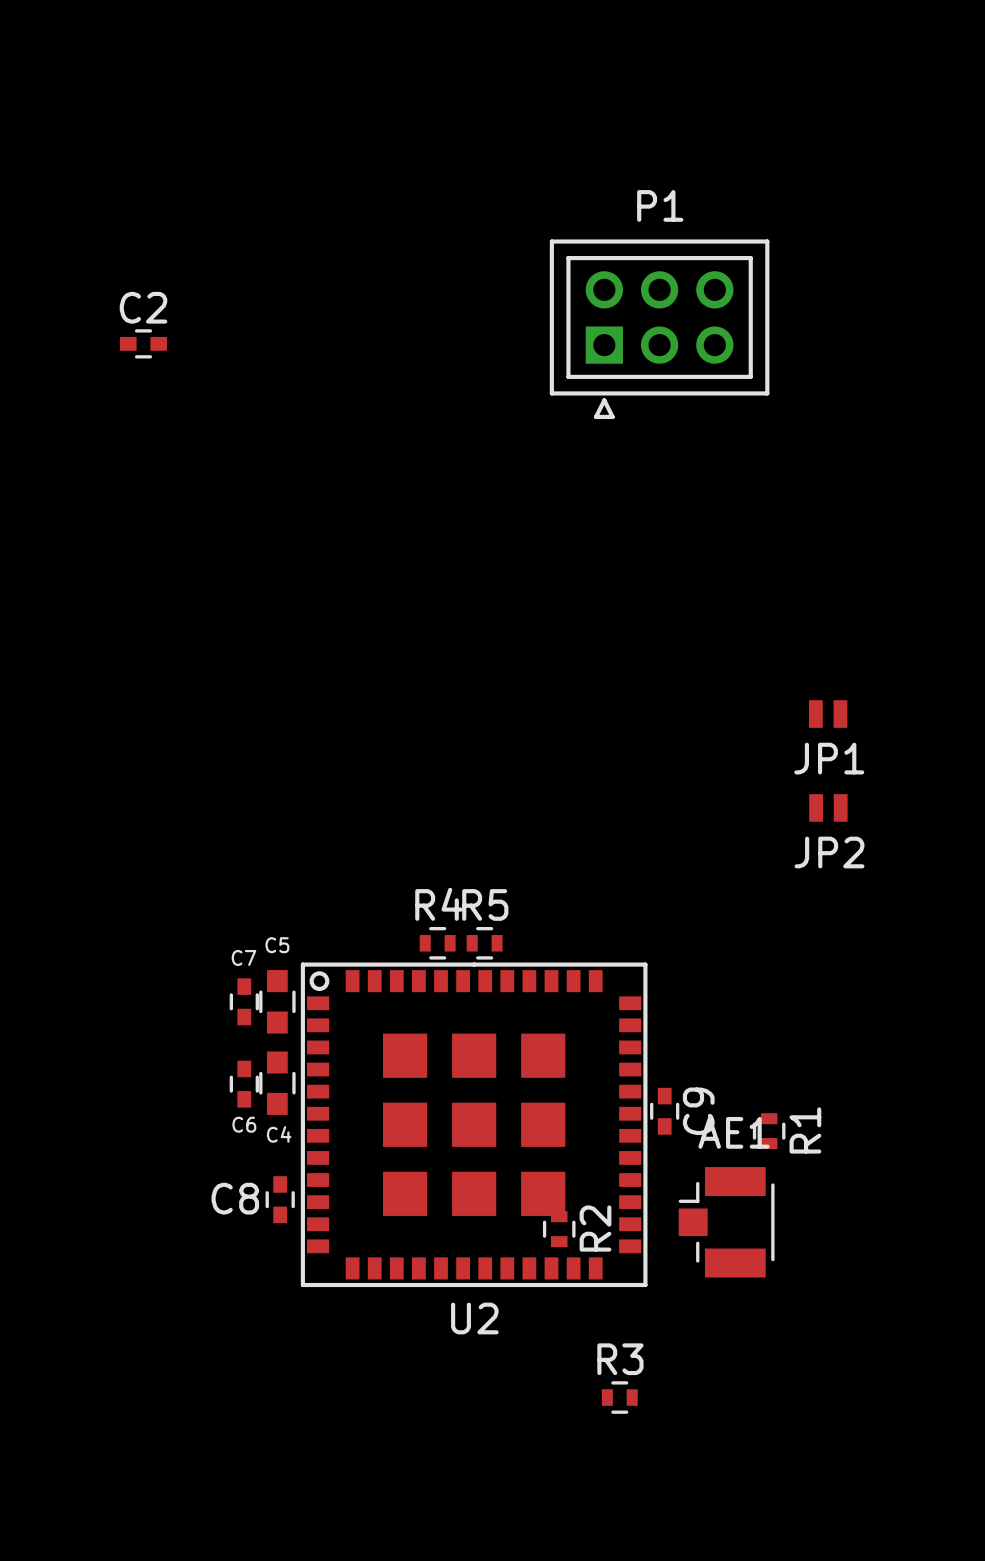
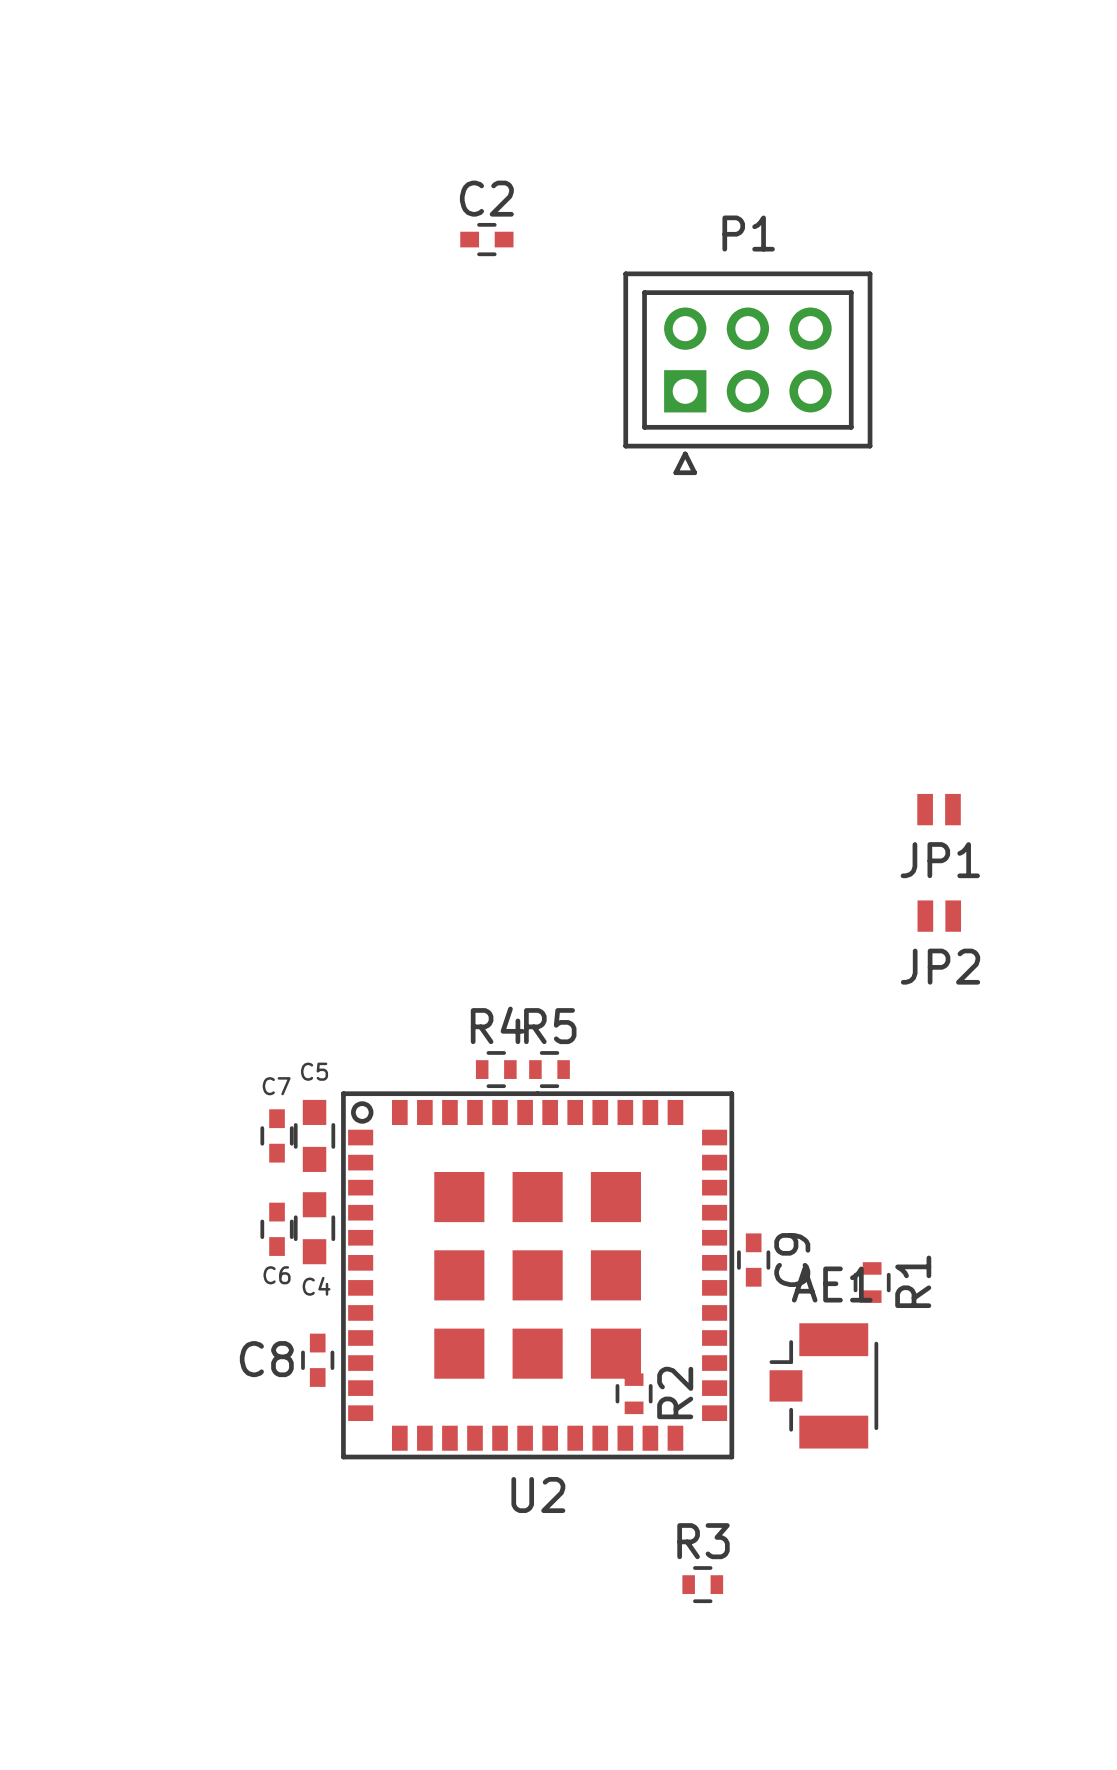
C2 position: (143, 343) -> (486, 239)

